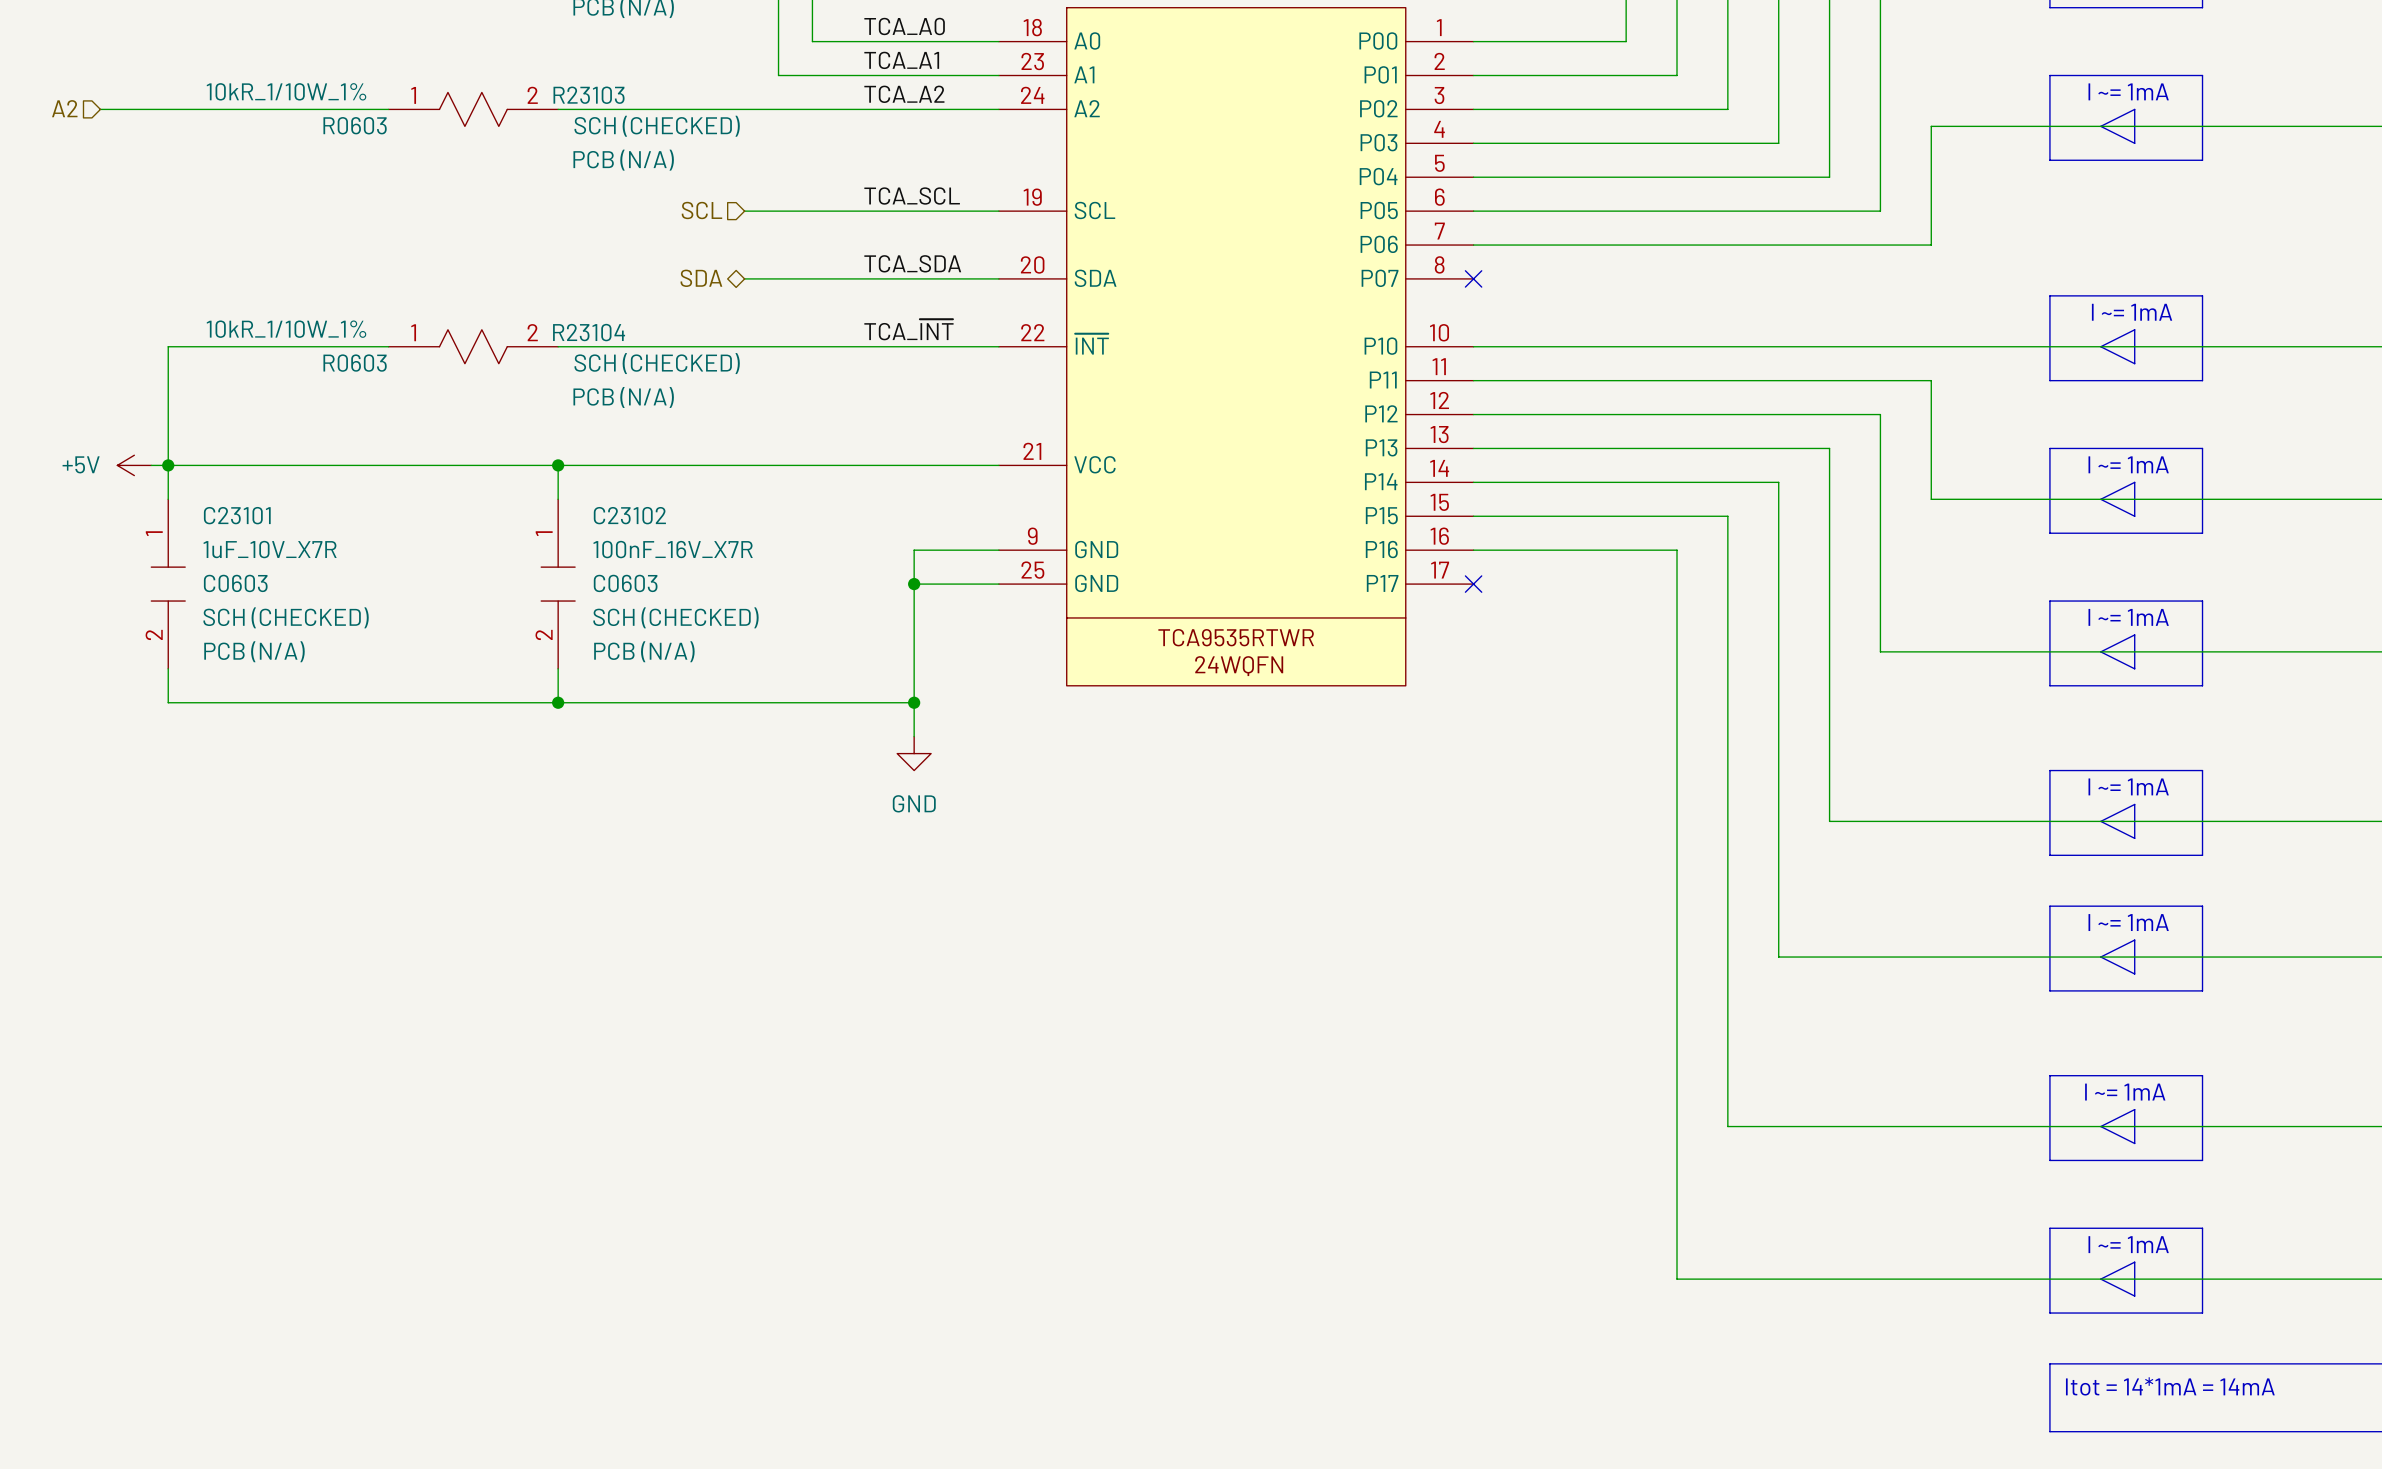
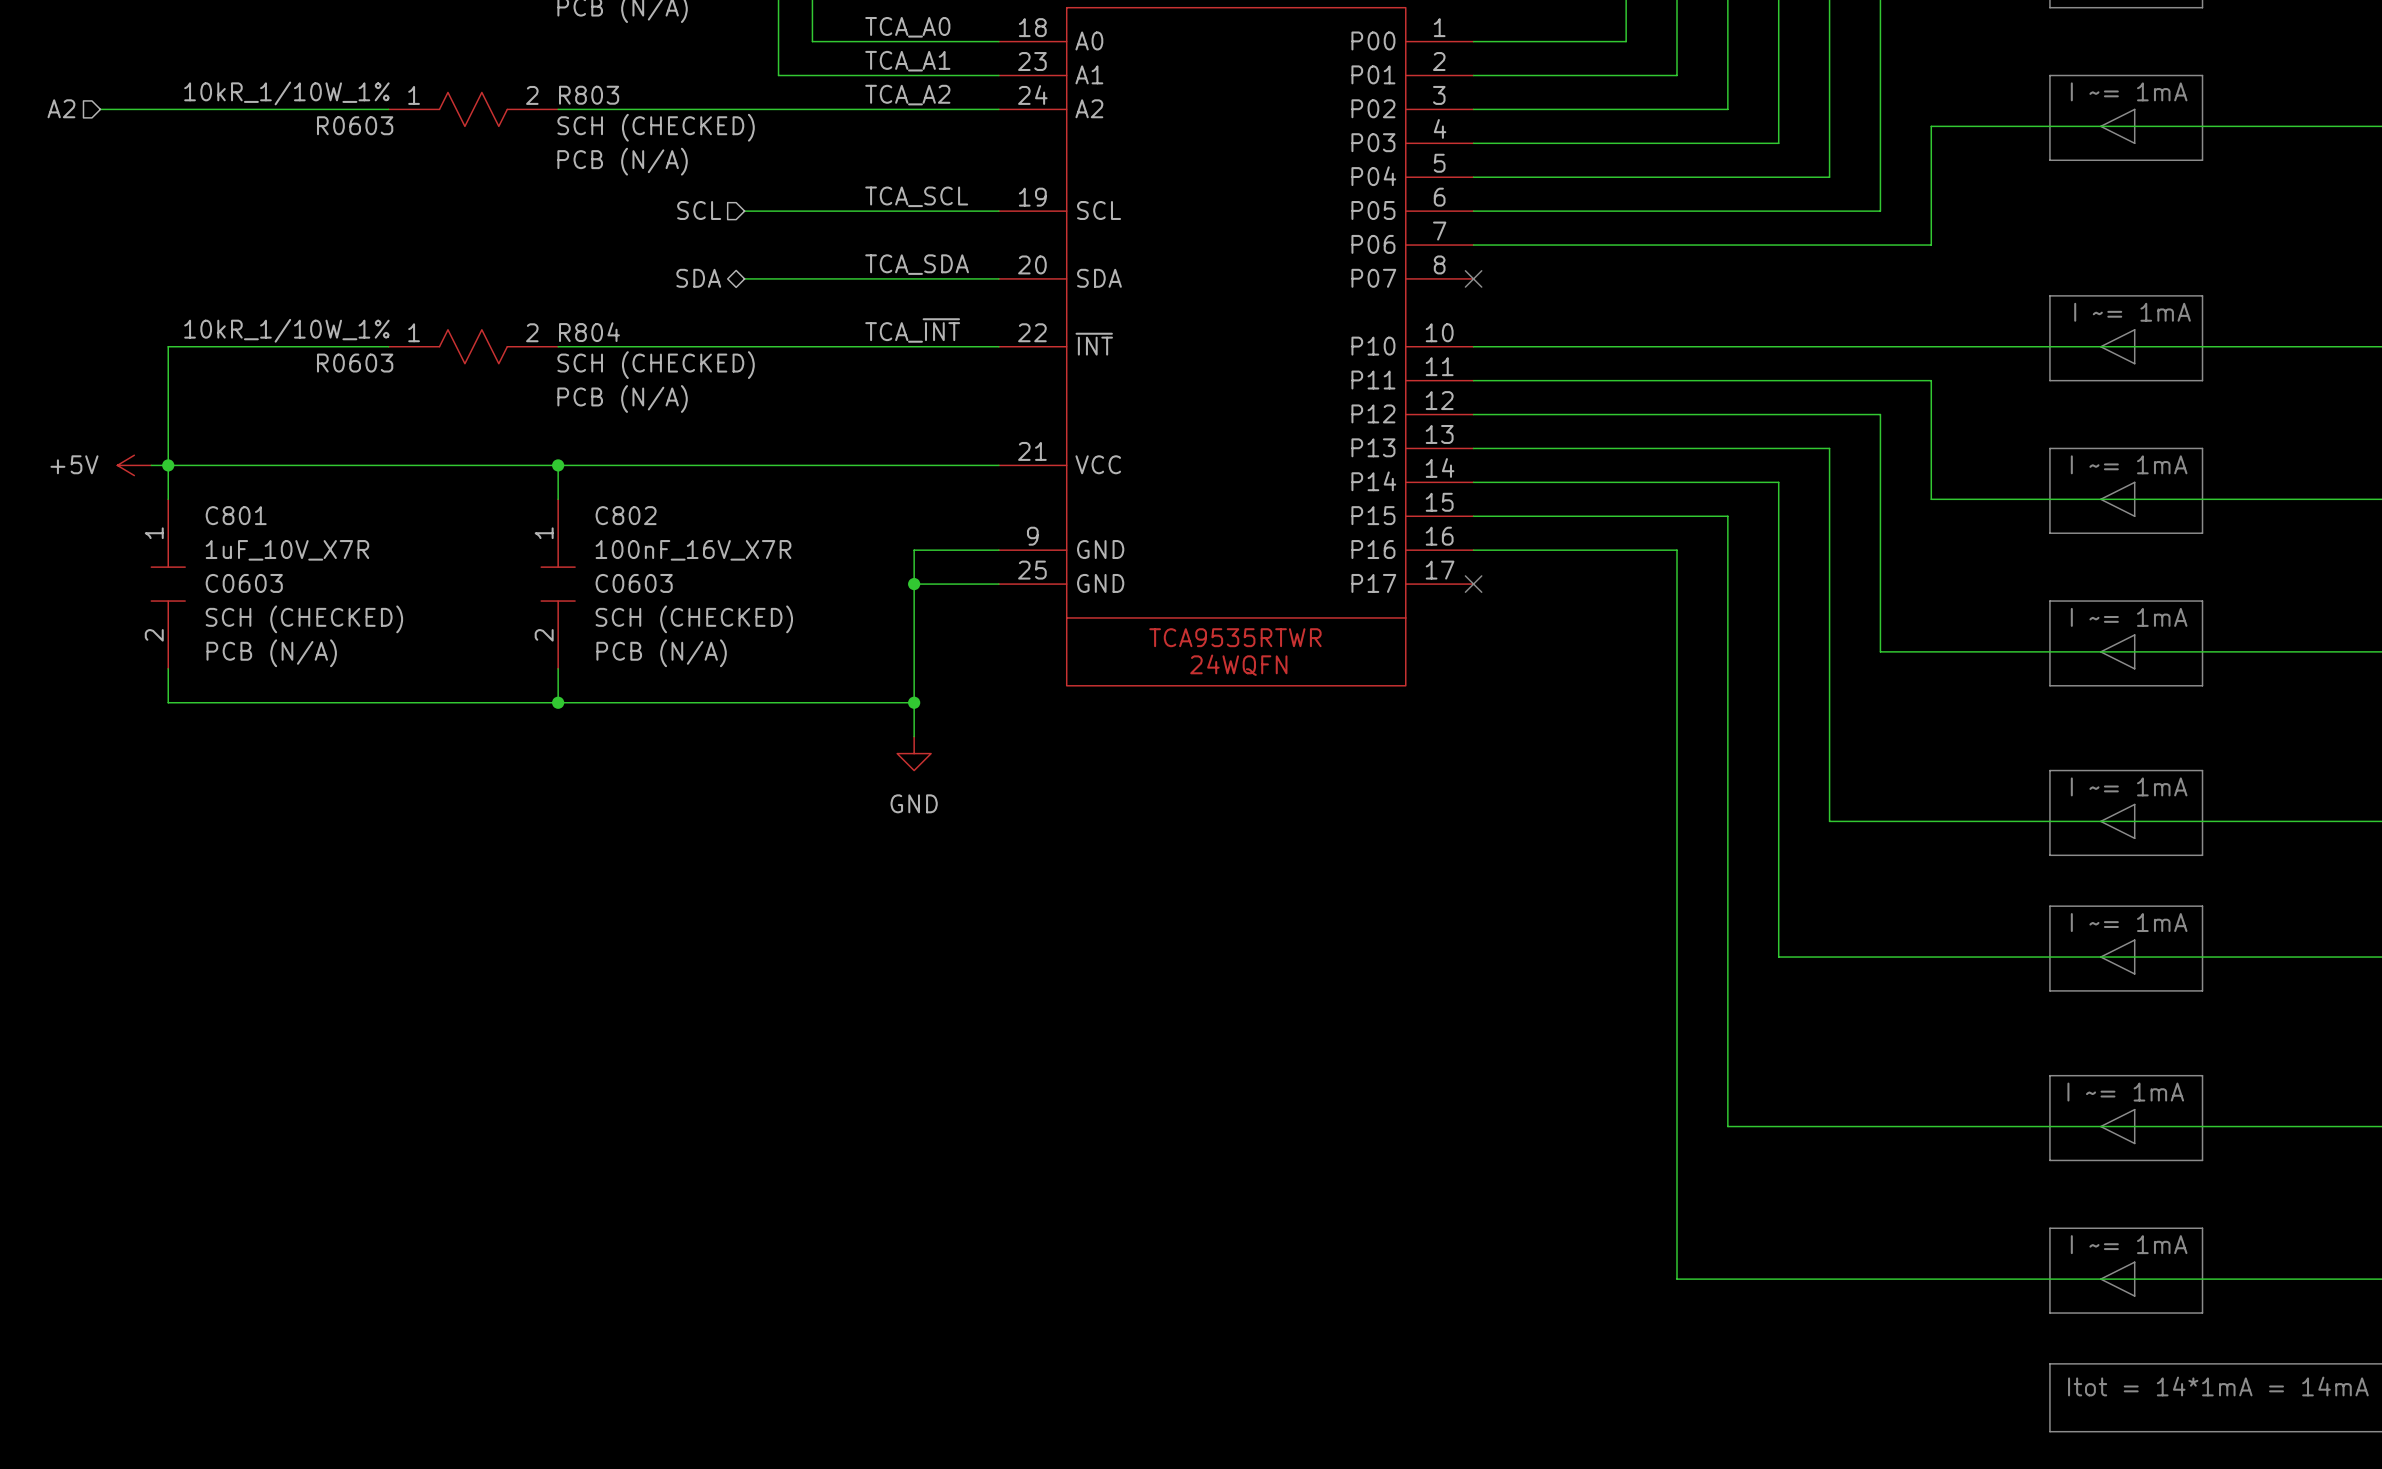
R23103 name: R23103 (589, 95) -> R803 (589, 95)
R23104 name: R23104 (589, 332) -> R804 (589, 332)
C23101 name: C23101 (237, 515) -> C801 (236, 515)
C23102 name: C23102 (629, 515) -> C802 (626, 515)

